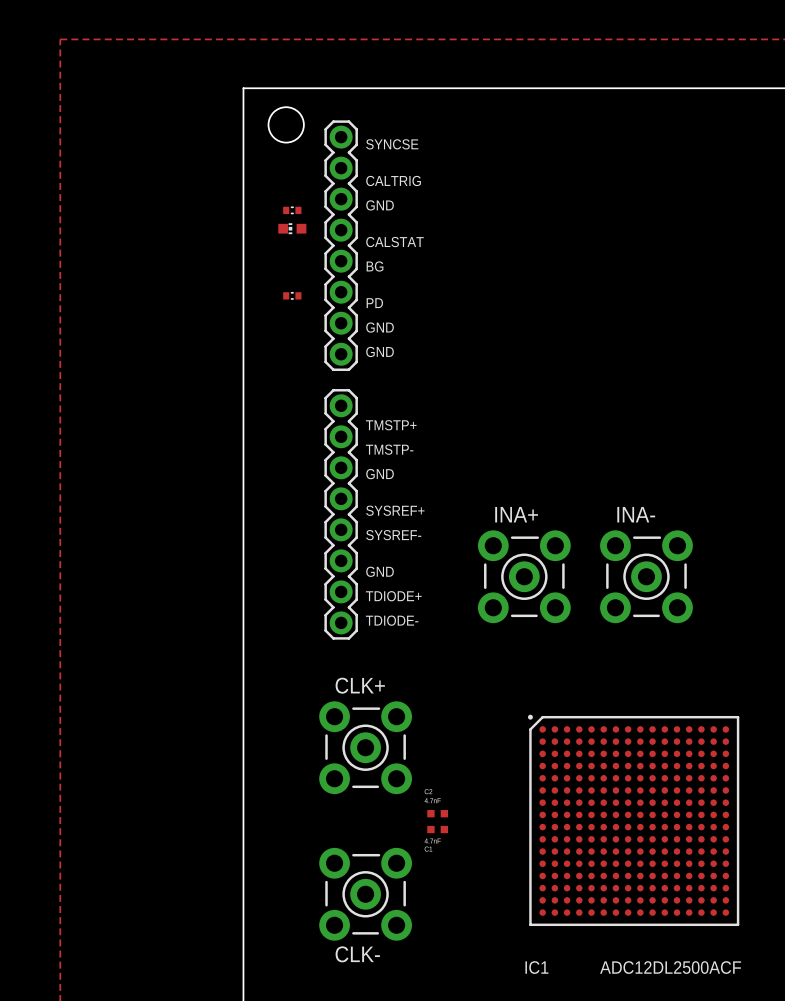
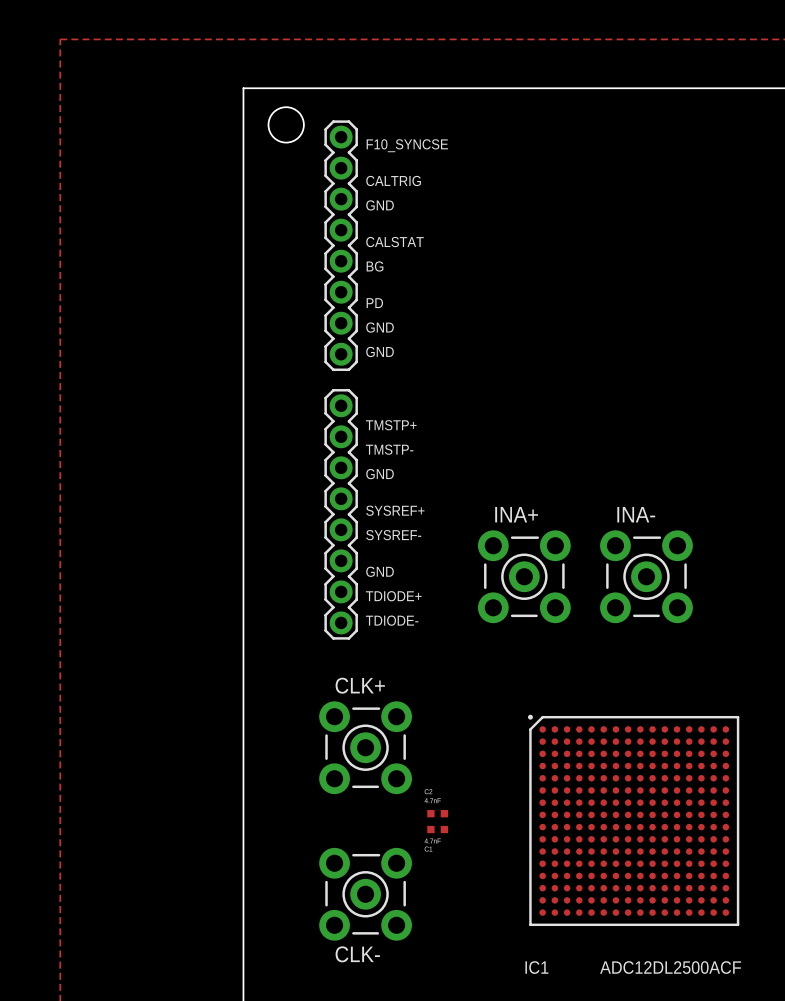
text: SYNCSE (392, 144) -> F10_SYNCSE (407, 145)
part: (292, 210) -> none
part: (292, 228) -> none
part: (292, 295) -> none

